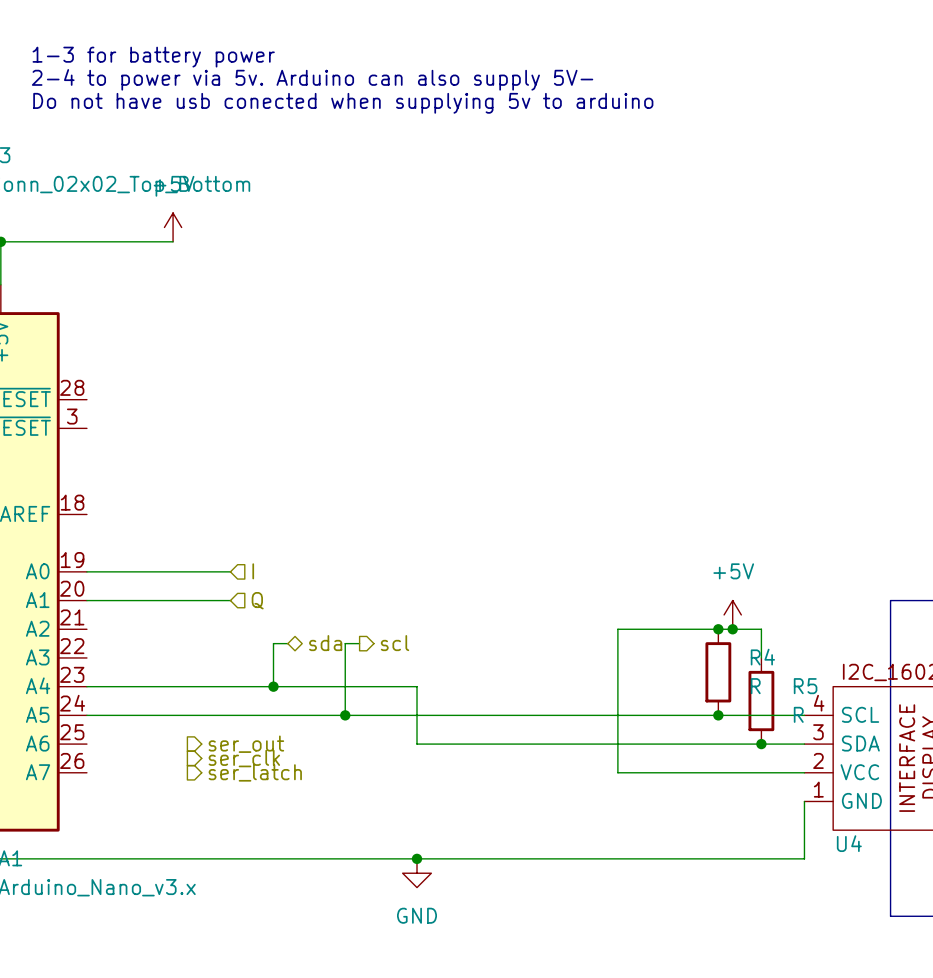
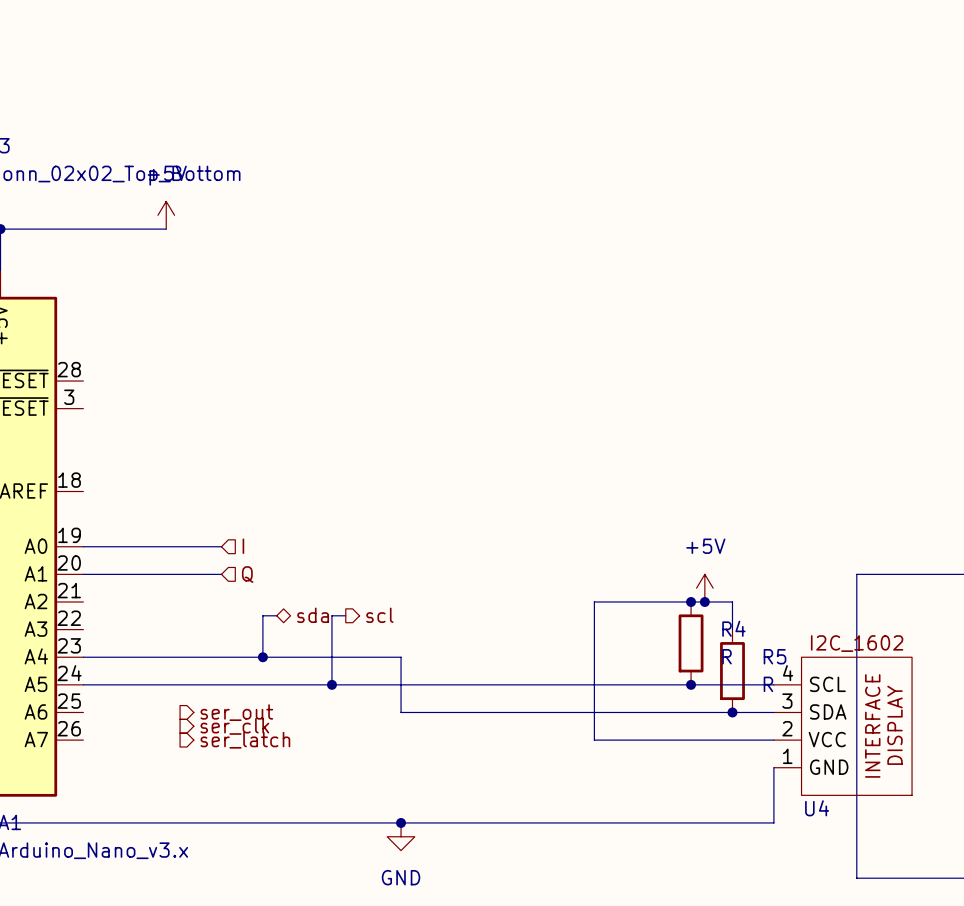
text: 1-3 for battery power (153, 57) -> none
text: 2-4 to power via 5v. Arduino can also supply 5V- (312, 79) -> none
text: Do not have usb conected when supplying 5v to arduino (343, 103) -> none

